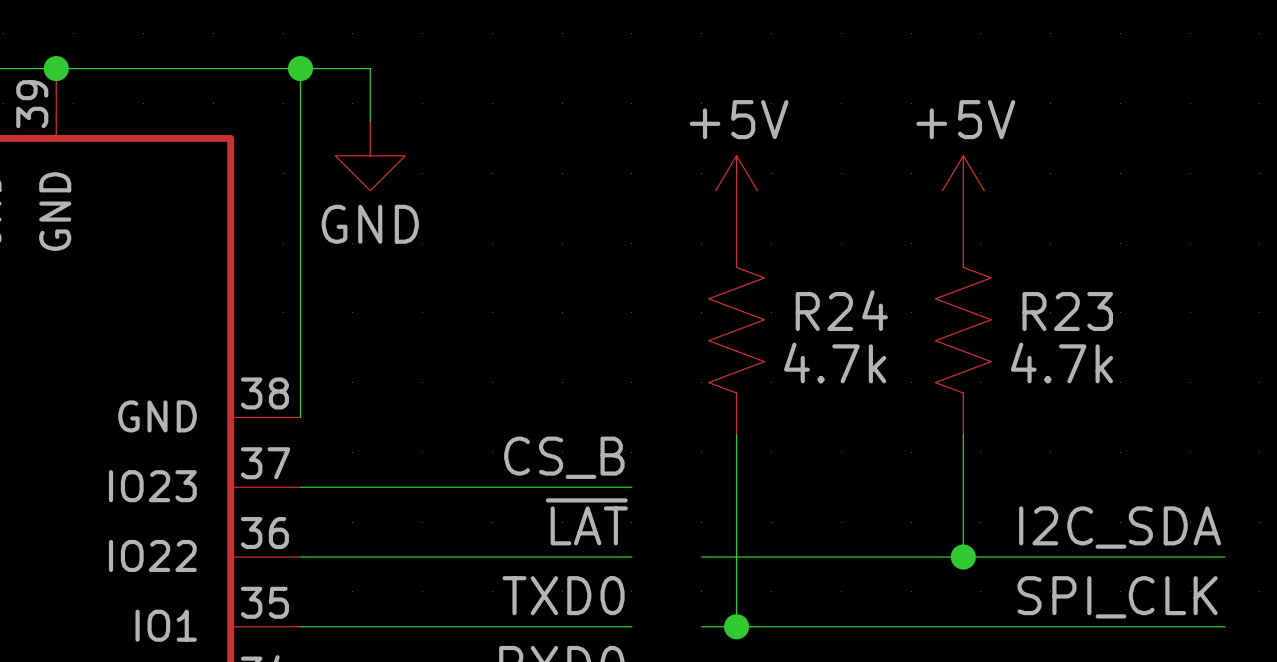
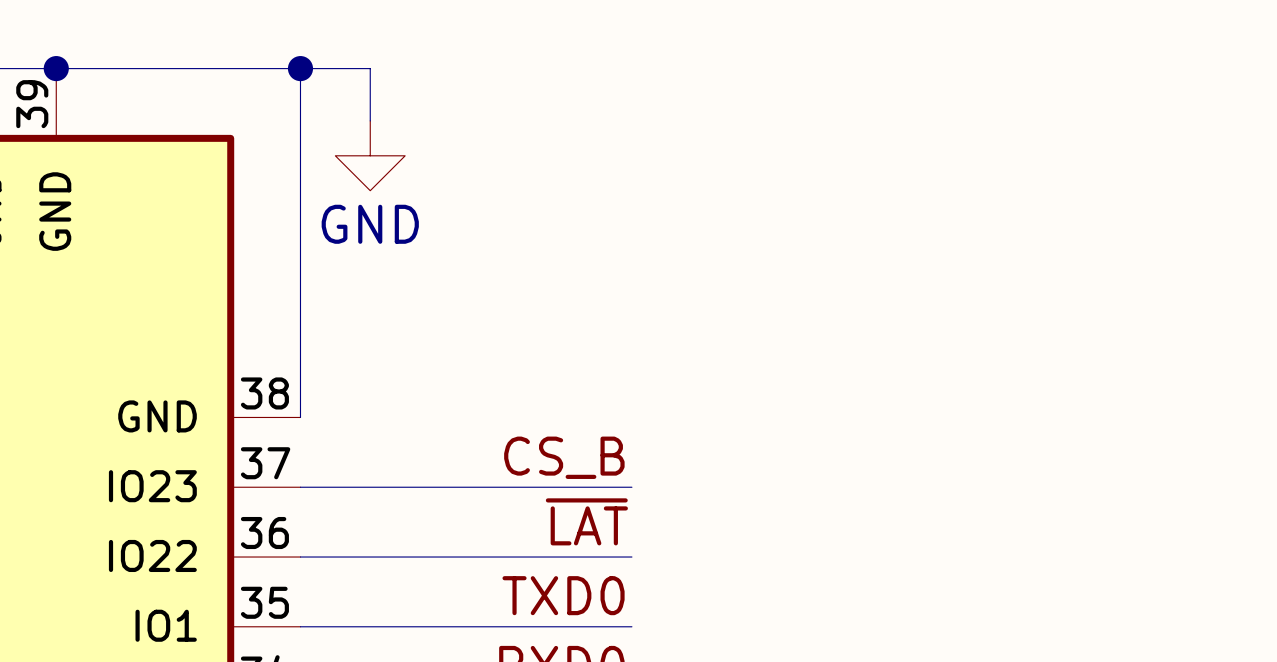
power symbol: +5V (736, 190) -> none
power symbol: +5V (963, 190) -> none
R24: 4.7k (736, 330) -> none
R23: 4.7k (963, 330) -> none
wire: (736, 434) (736, 626) -> none
wire: (963, 434) (963, 557) -> none
label: I2C_SDA (1120, 527) -> none
wire: (701, 557) (1224, 557) -> none
junction: (963, 557) -> none
label: SPI_CLK (1117, 597) -> none
wire: (701, 626) (1224, 626) -> none
junction: (736, 626) -> none

